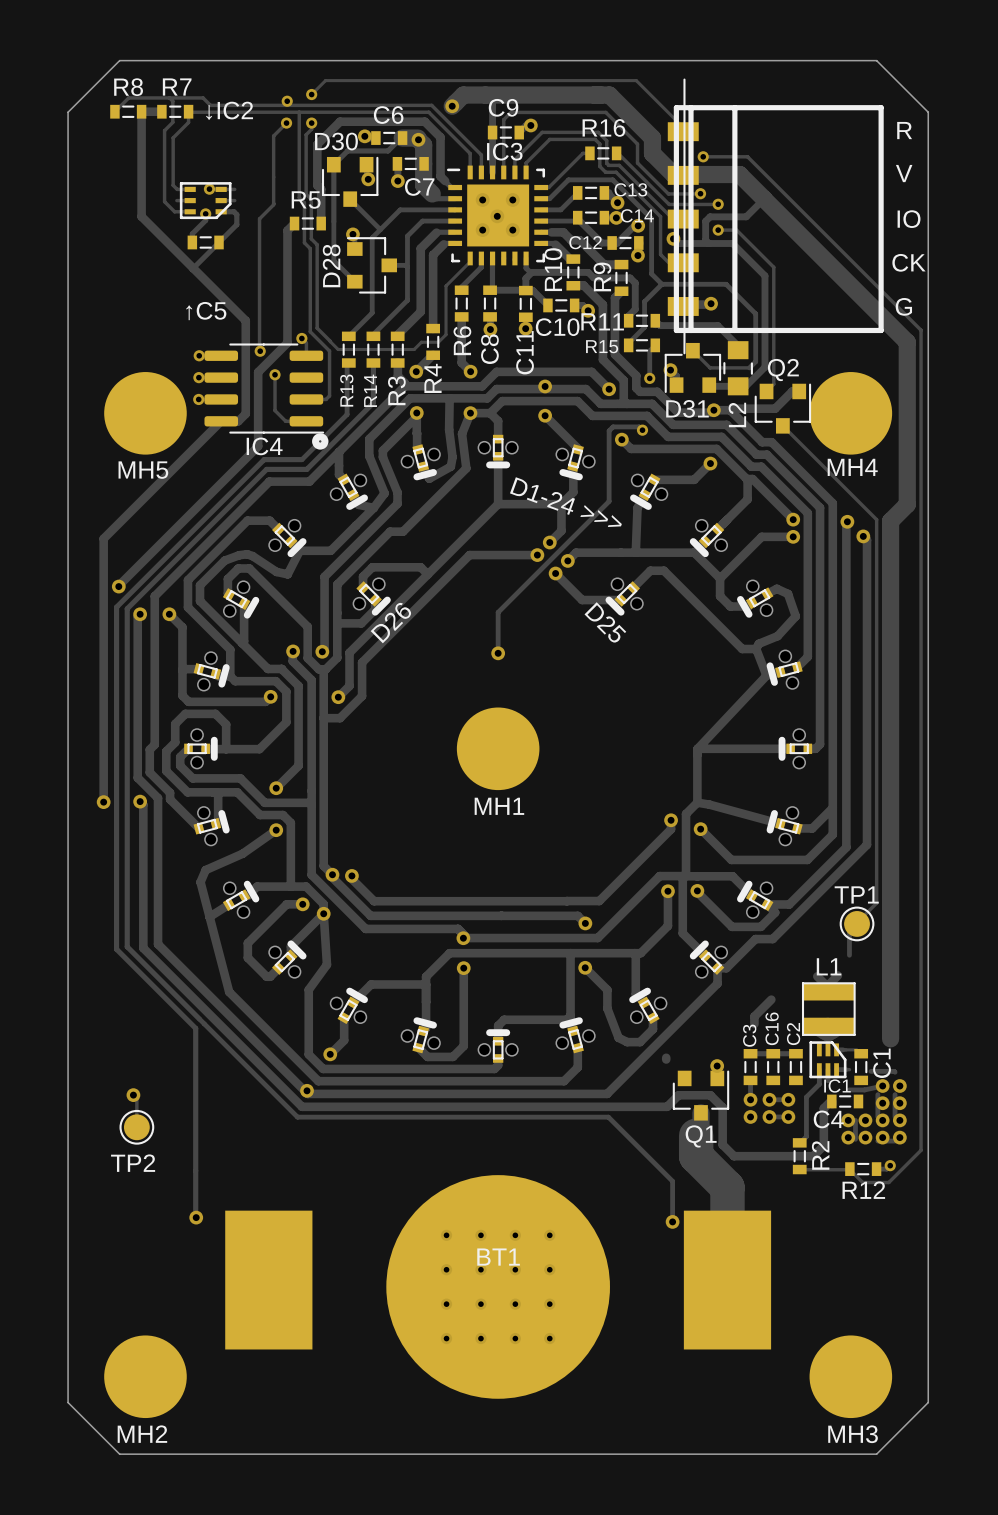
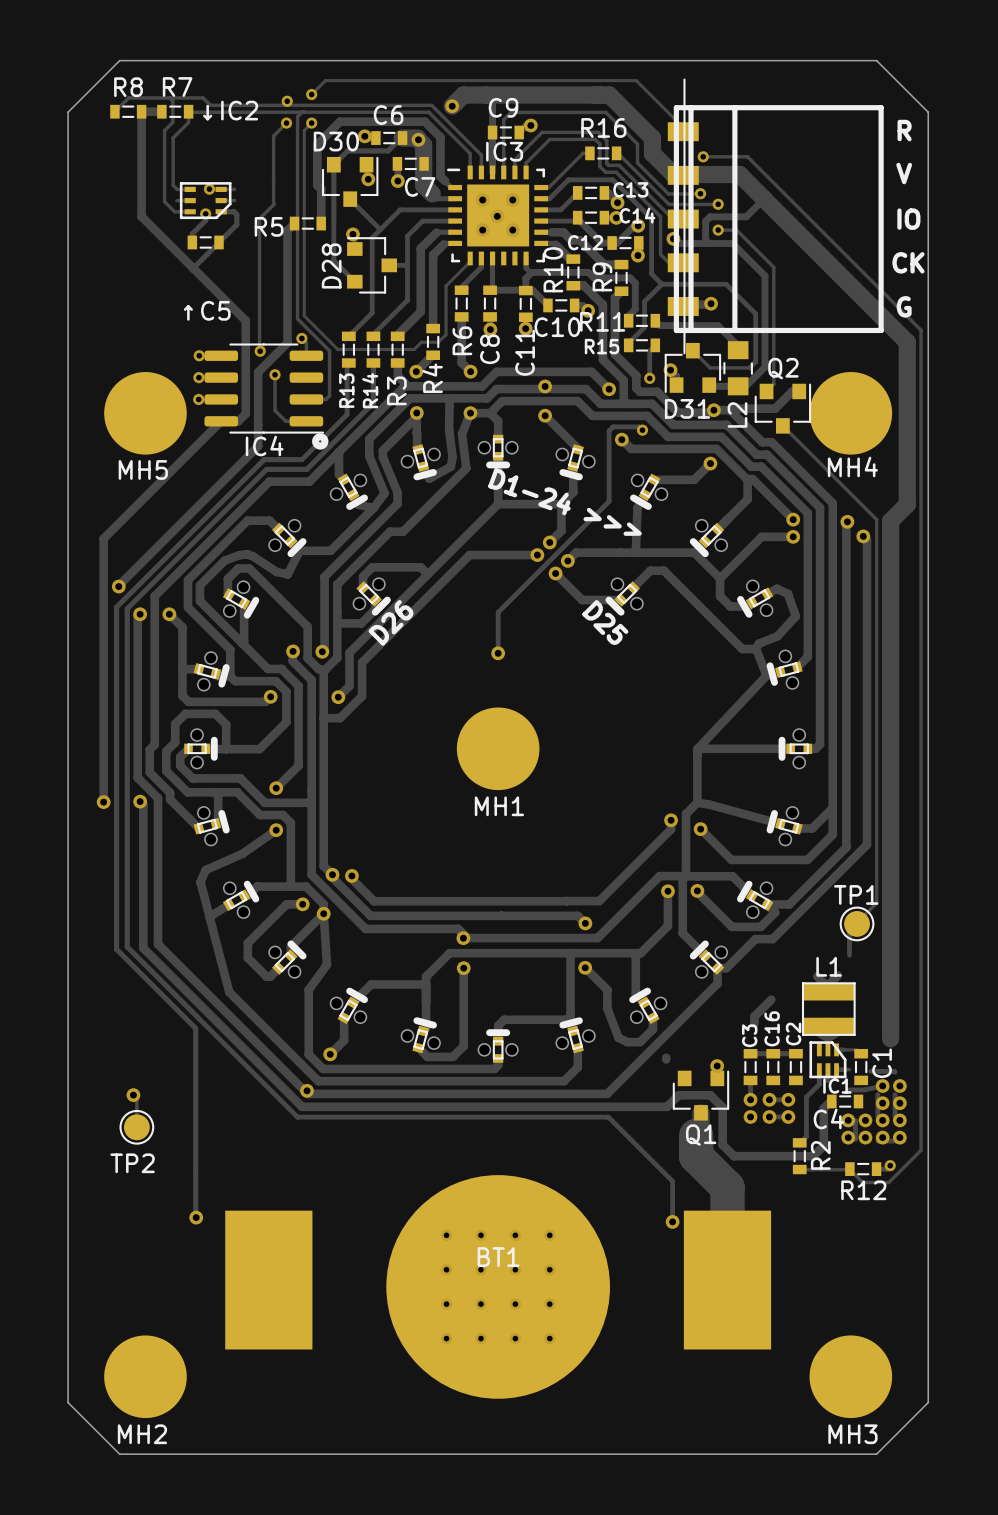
track: (299, 112) (299, 197) (304, 202) (304, 242) (310, 248) (310, 331) (329, 351) -> (302, 112) (297, 116) (297, 318) (329, 350)
track: (311, 123) (311, 129) (306, 134) (306, 194) (311, 199) (311, 238) (317, 244) (317, 328) (338, 349) -> (311, 123) (304, 130) (304, 315) (337, 349)
R5 name position: R5 (306, 199) -> R5 (269, 226)

